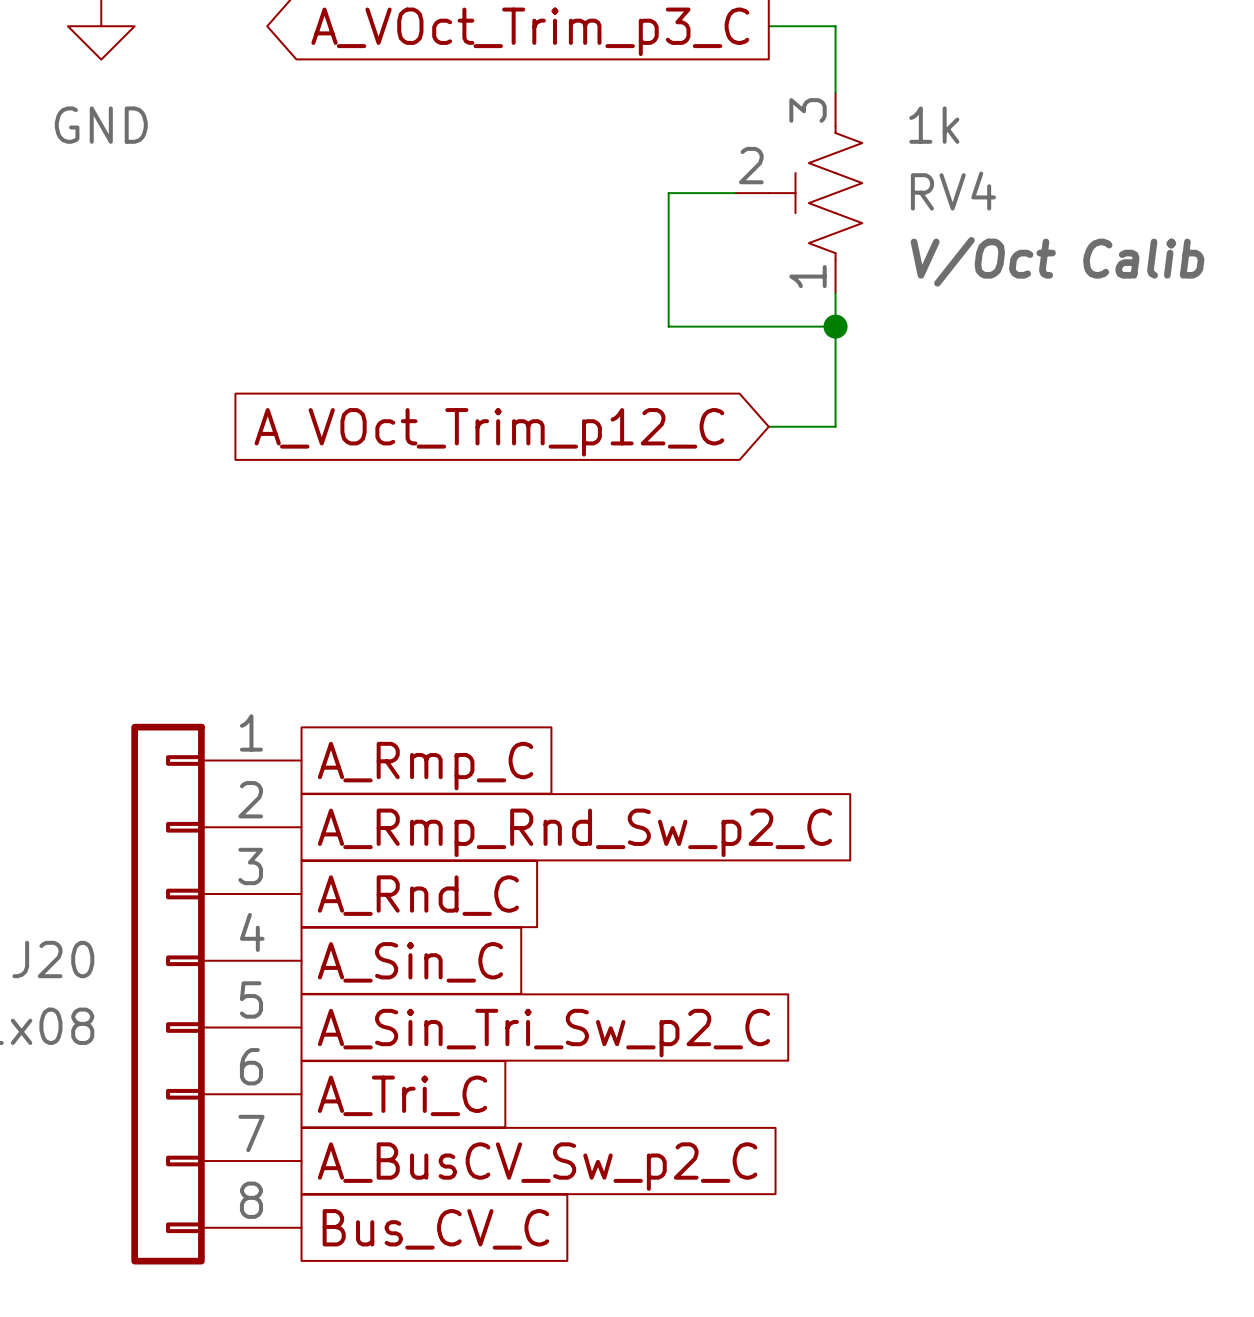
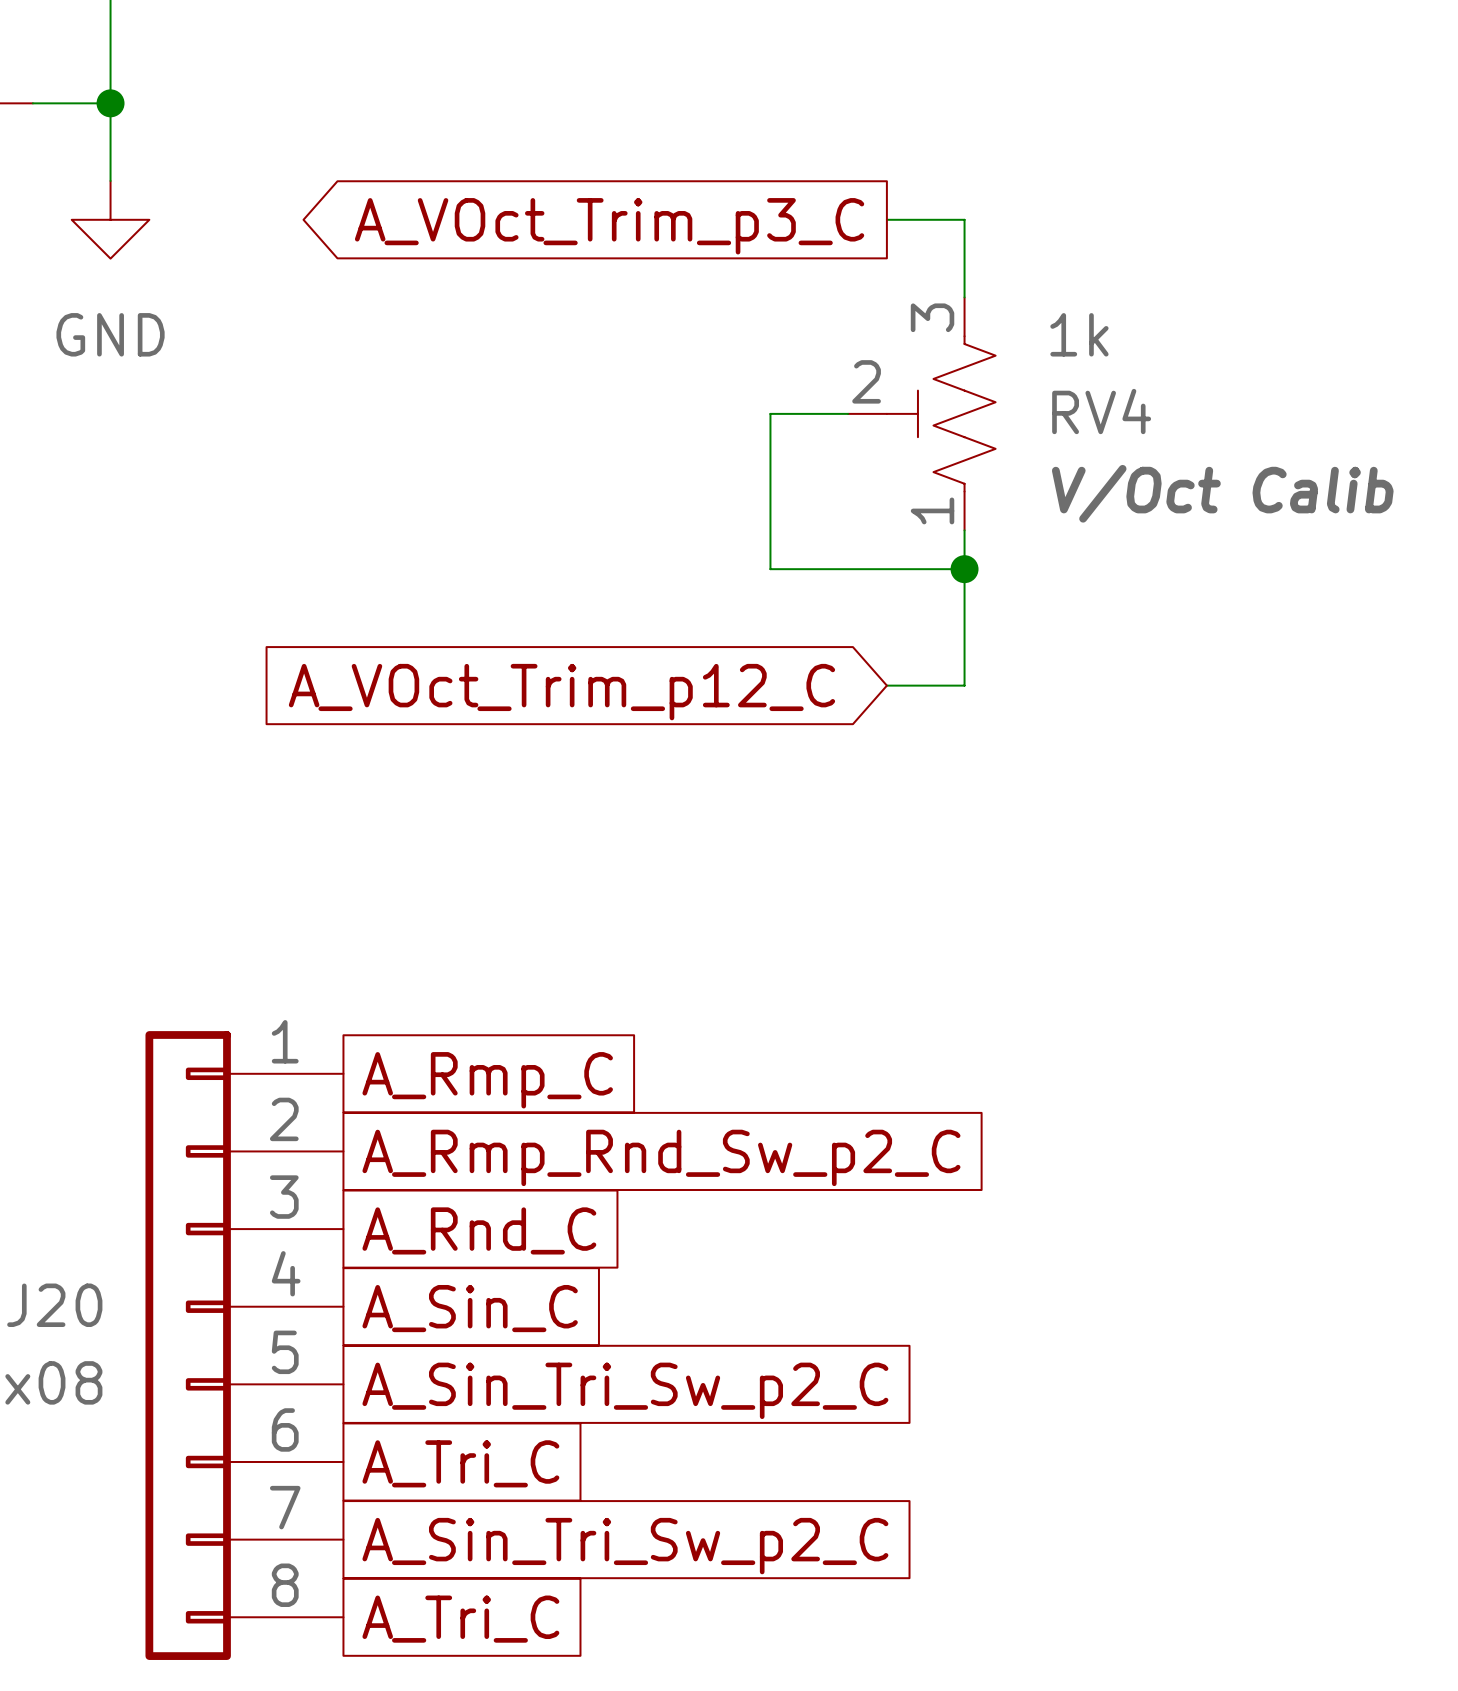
global label: A_BusCV_Sw_p2_C (537, 1166) -> A_Sin_Tri_Sw_p2_C (625, 1546)
global label: Bus_CV_C (435, 1229) -> A_Tri_C (460, 1619)

